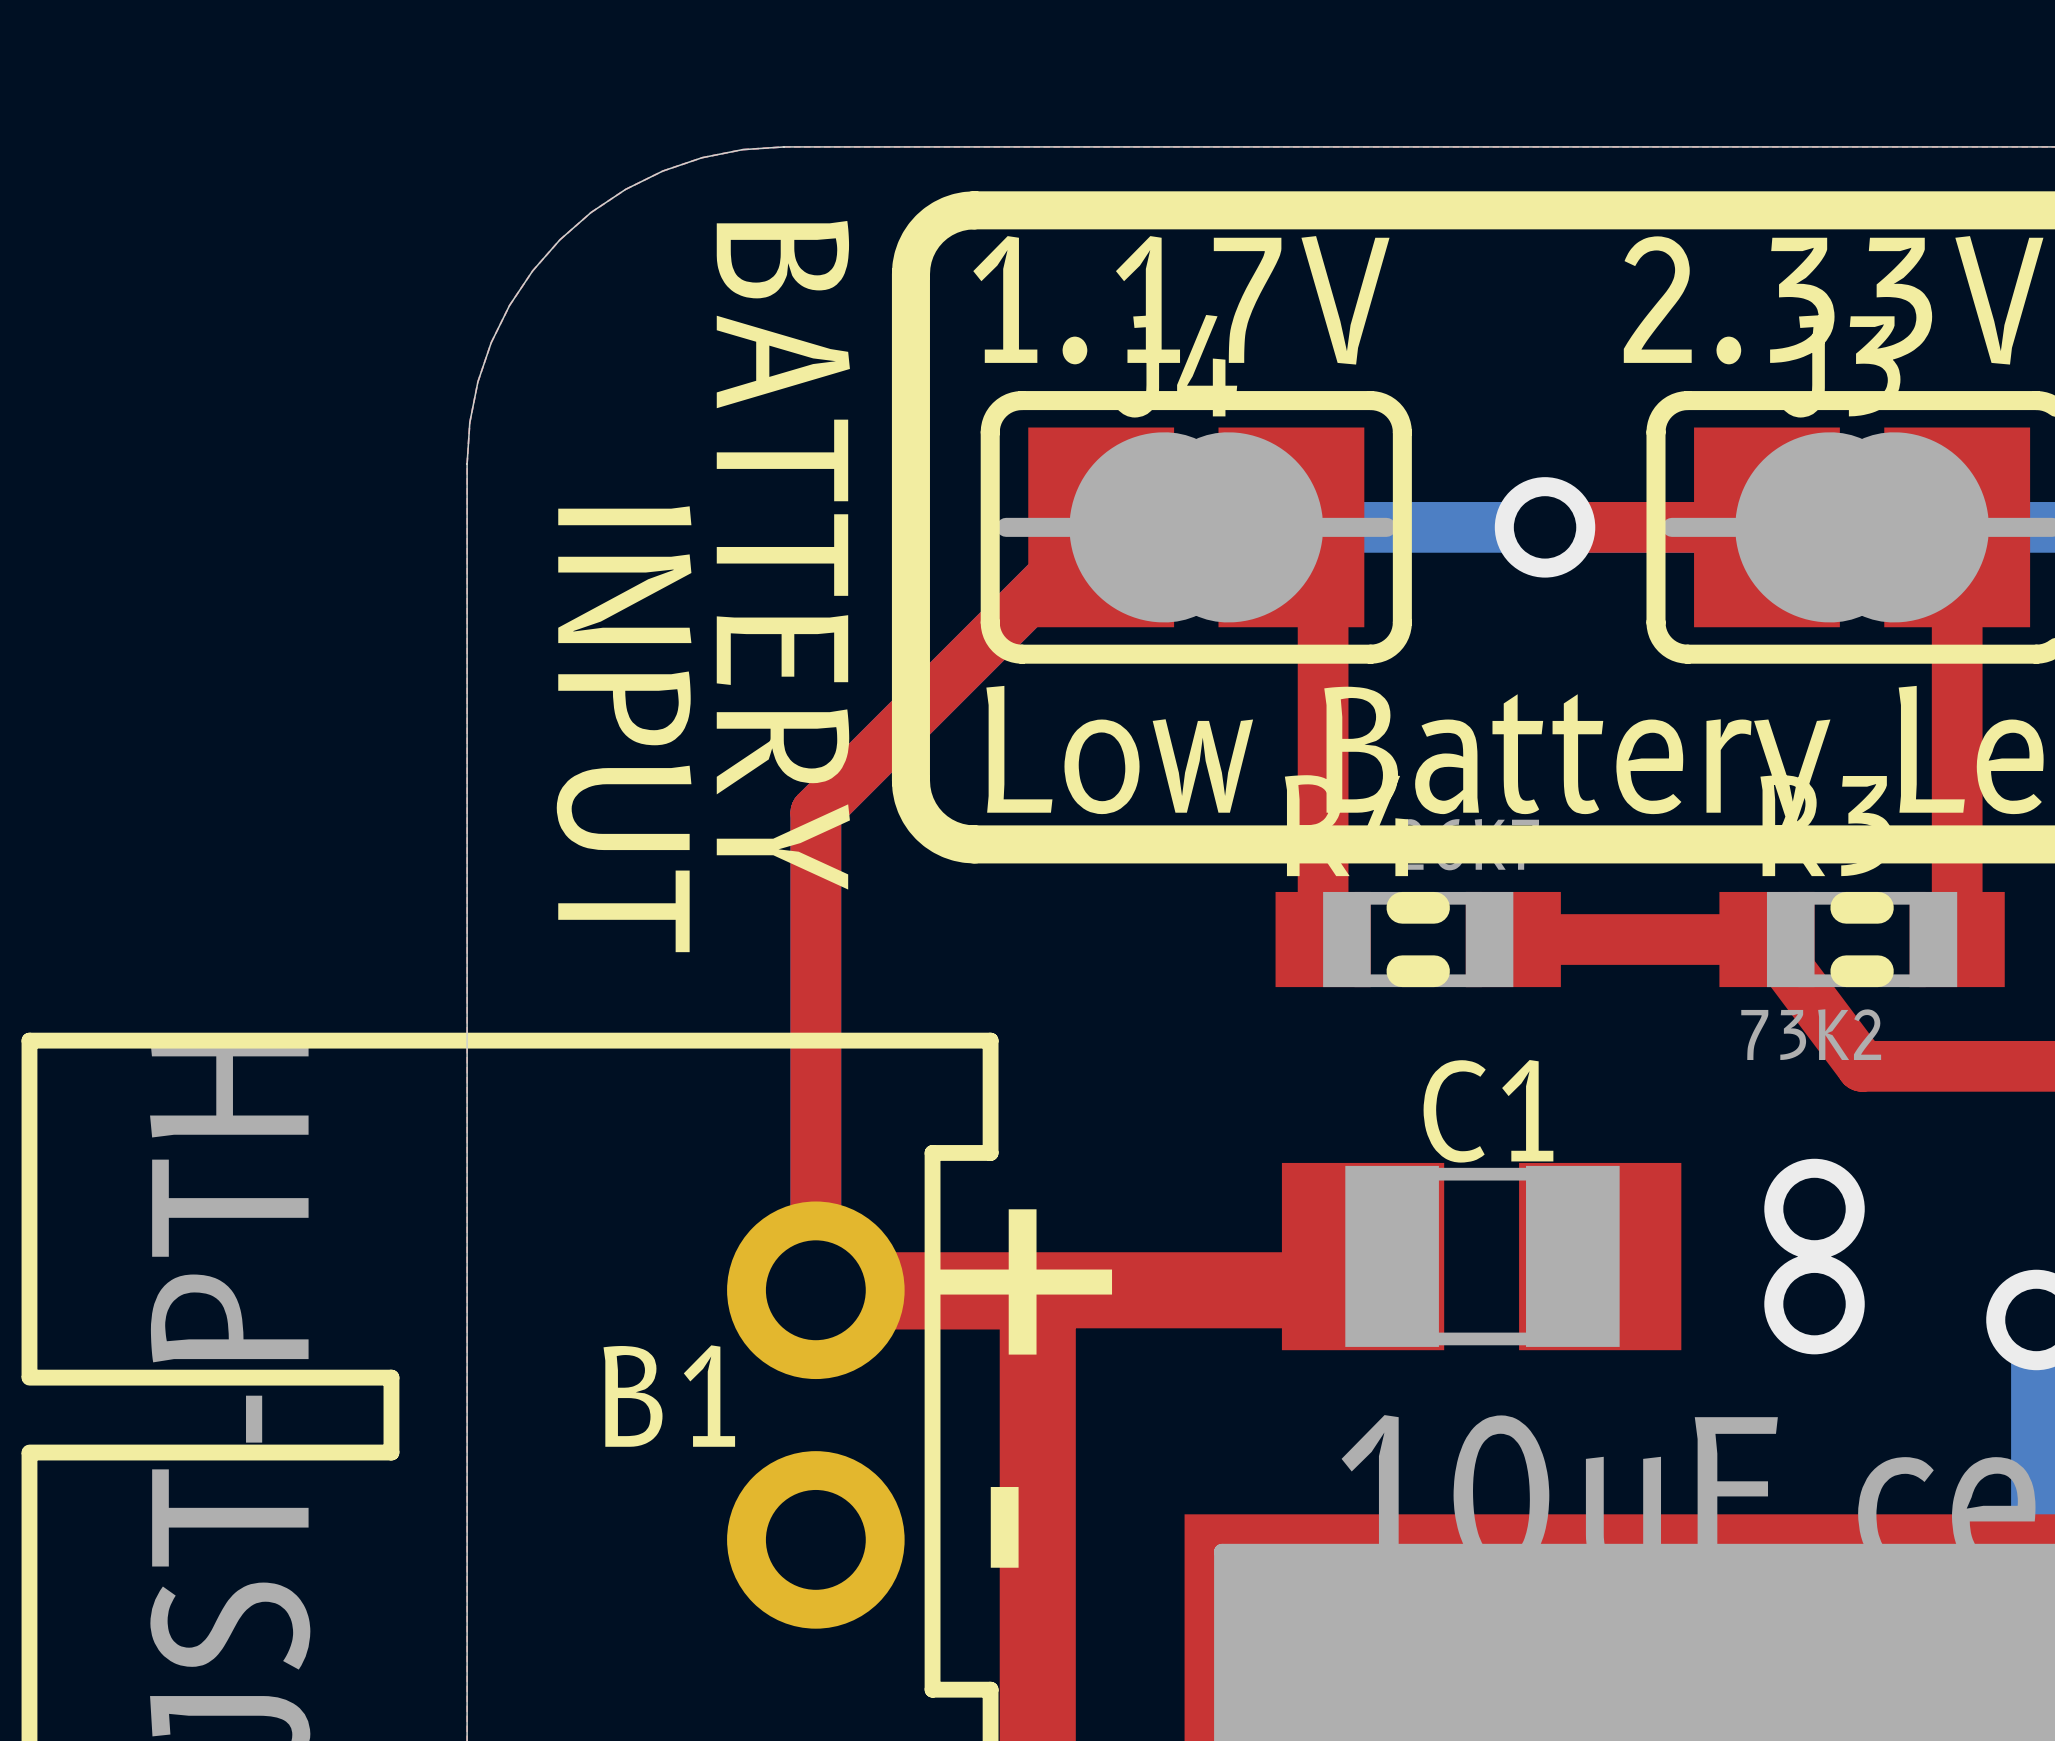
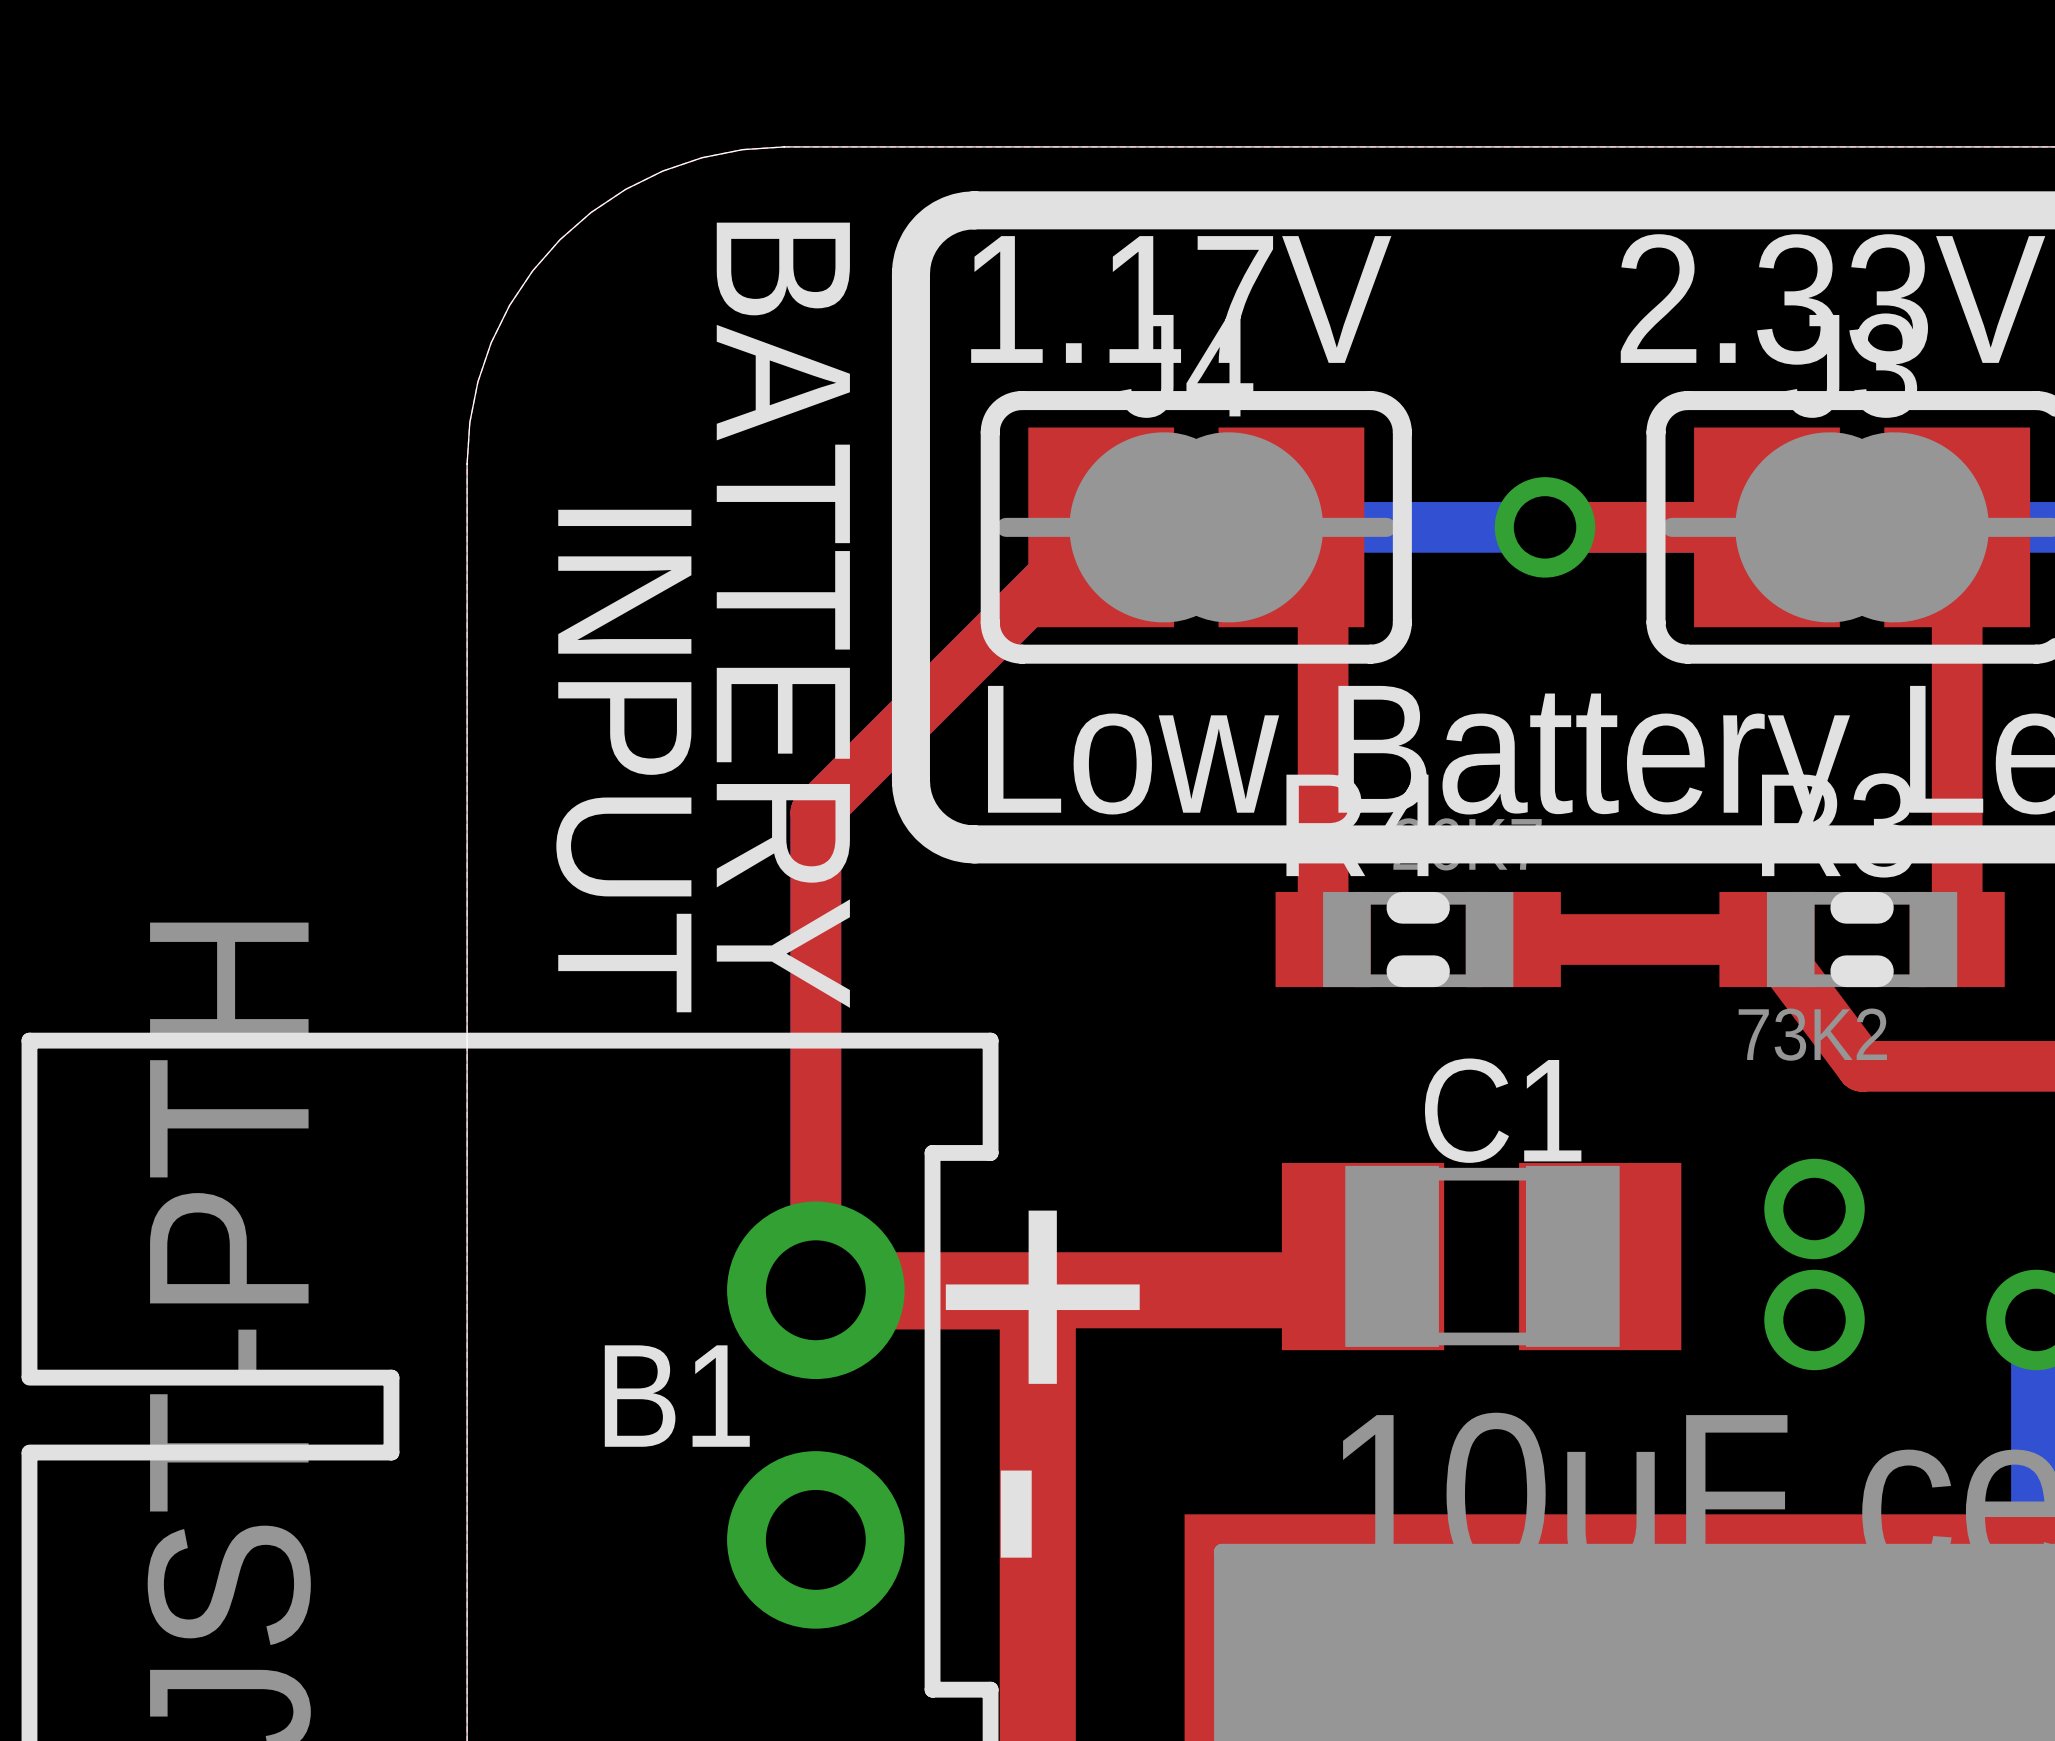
via position: (1814, 1304) -> (1814, 1319)

